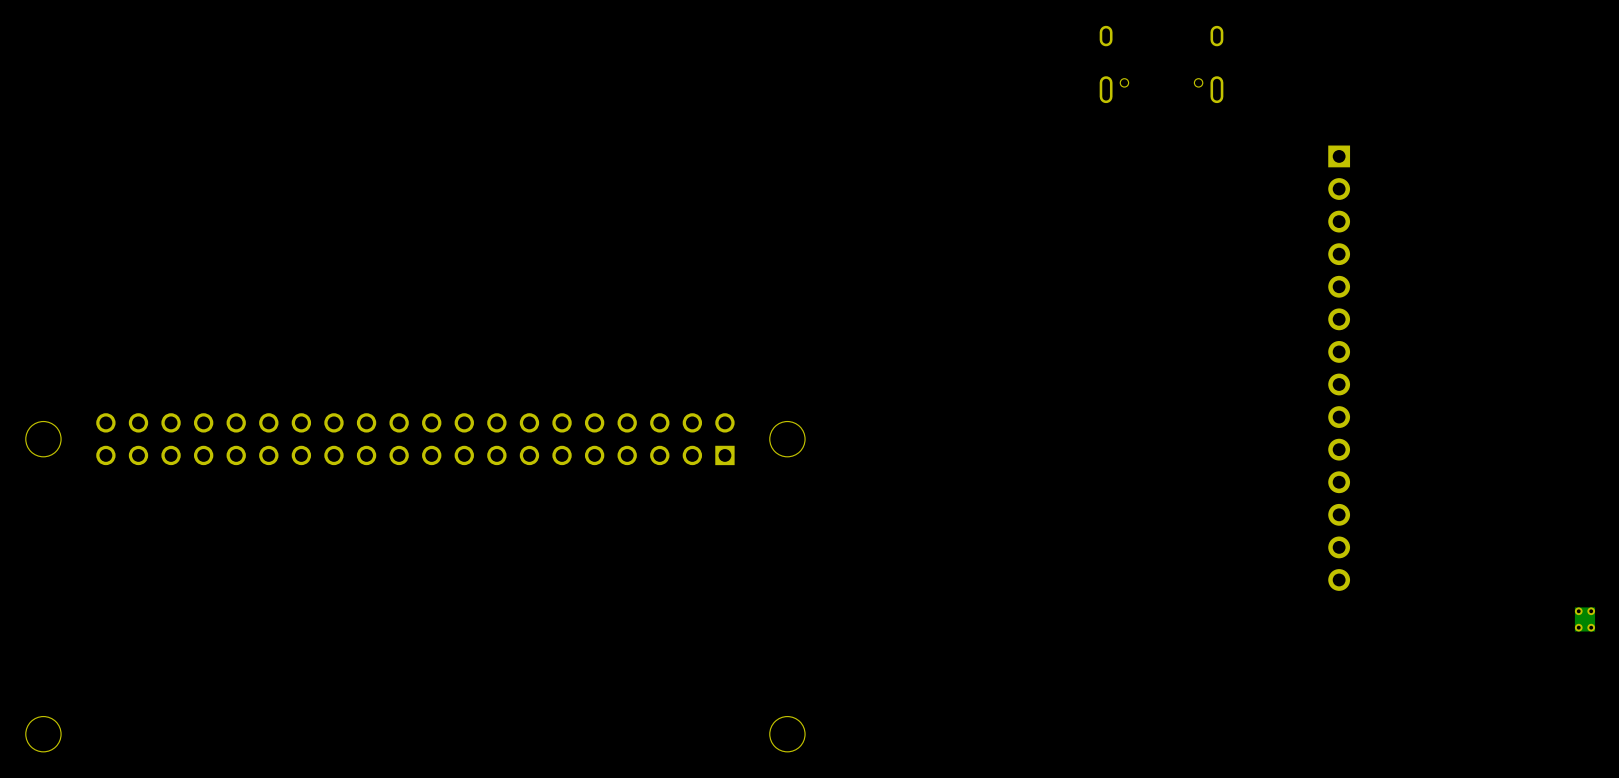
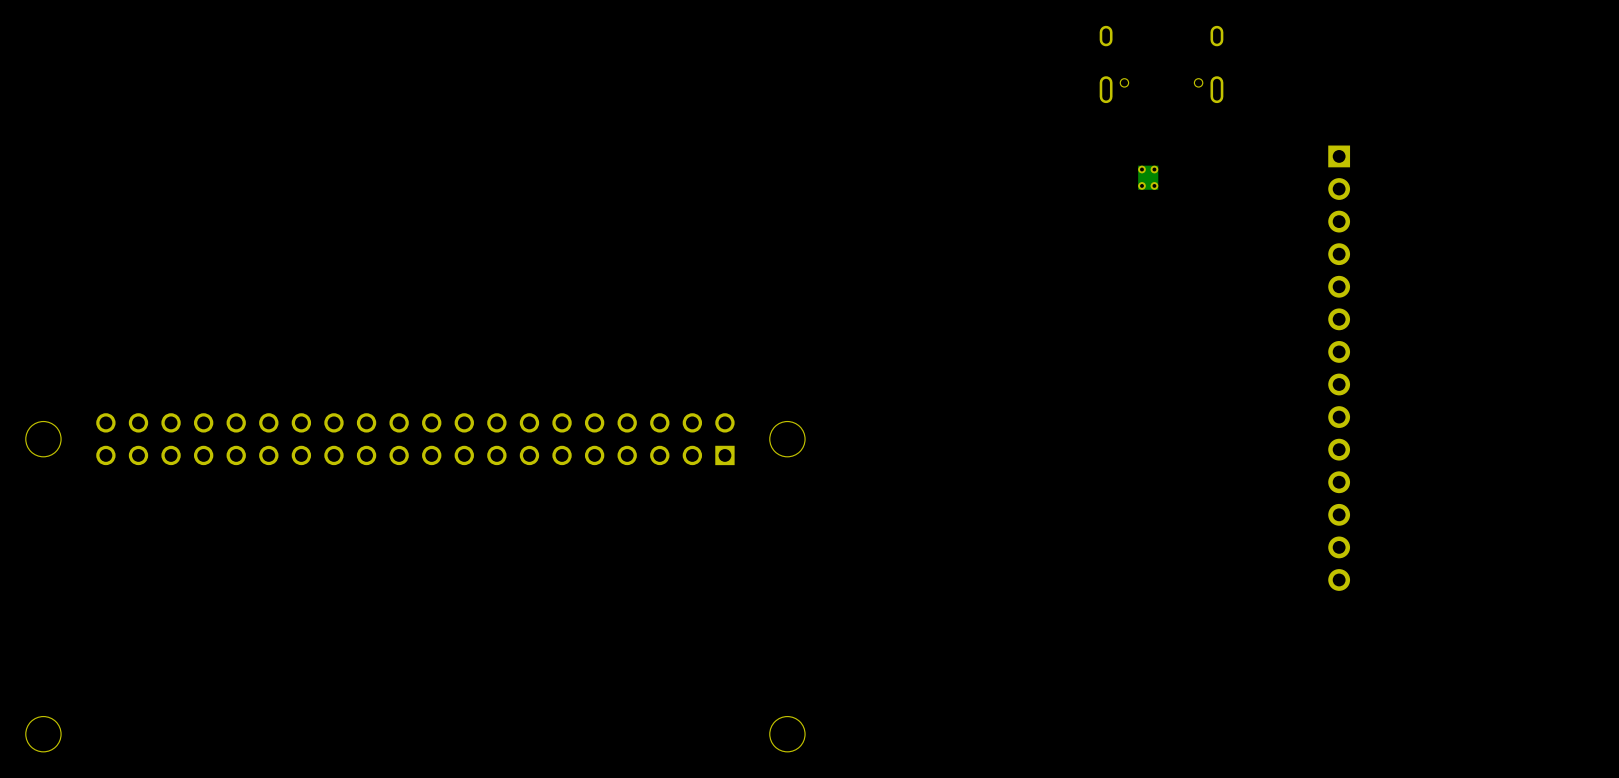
part: none -> (1148, 177)
part: (1584, 619) -> none

